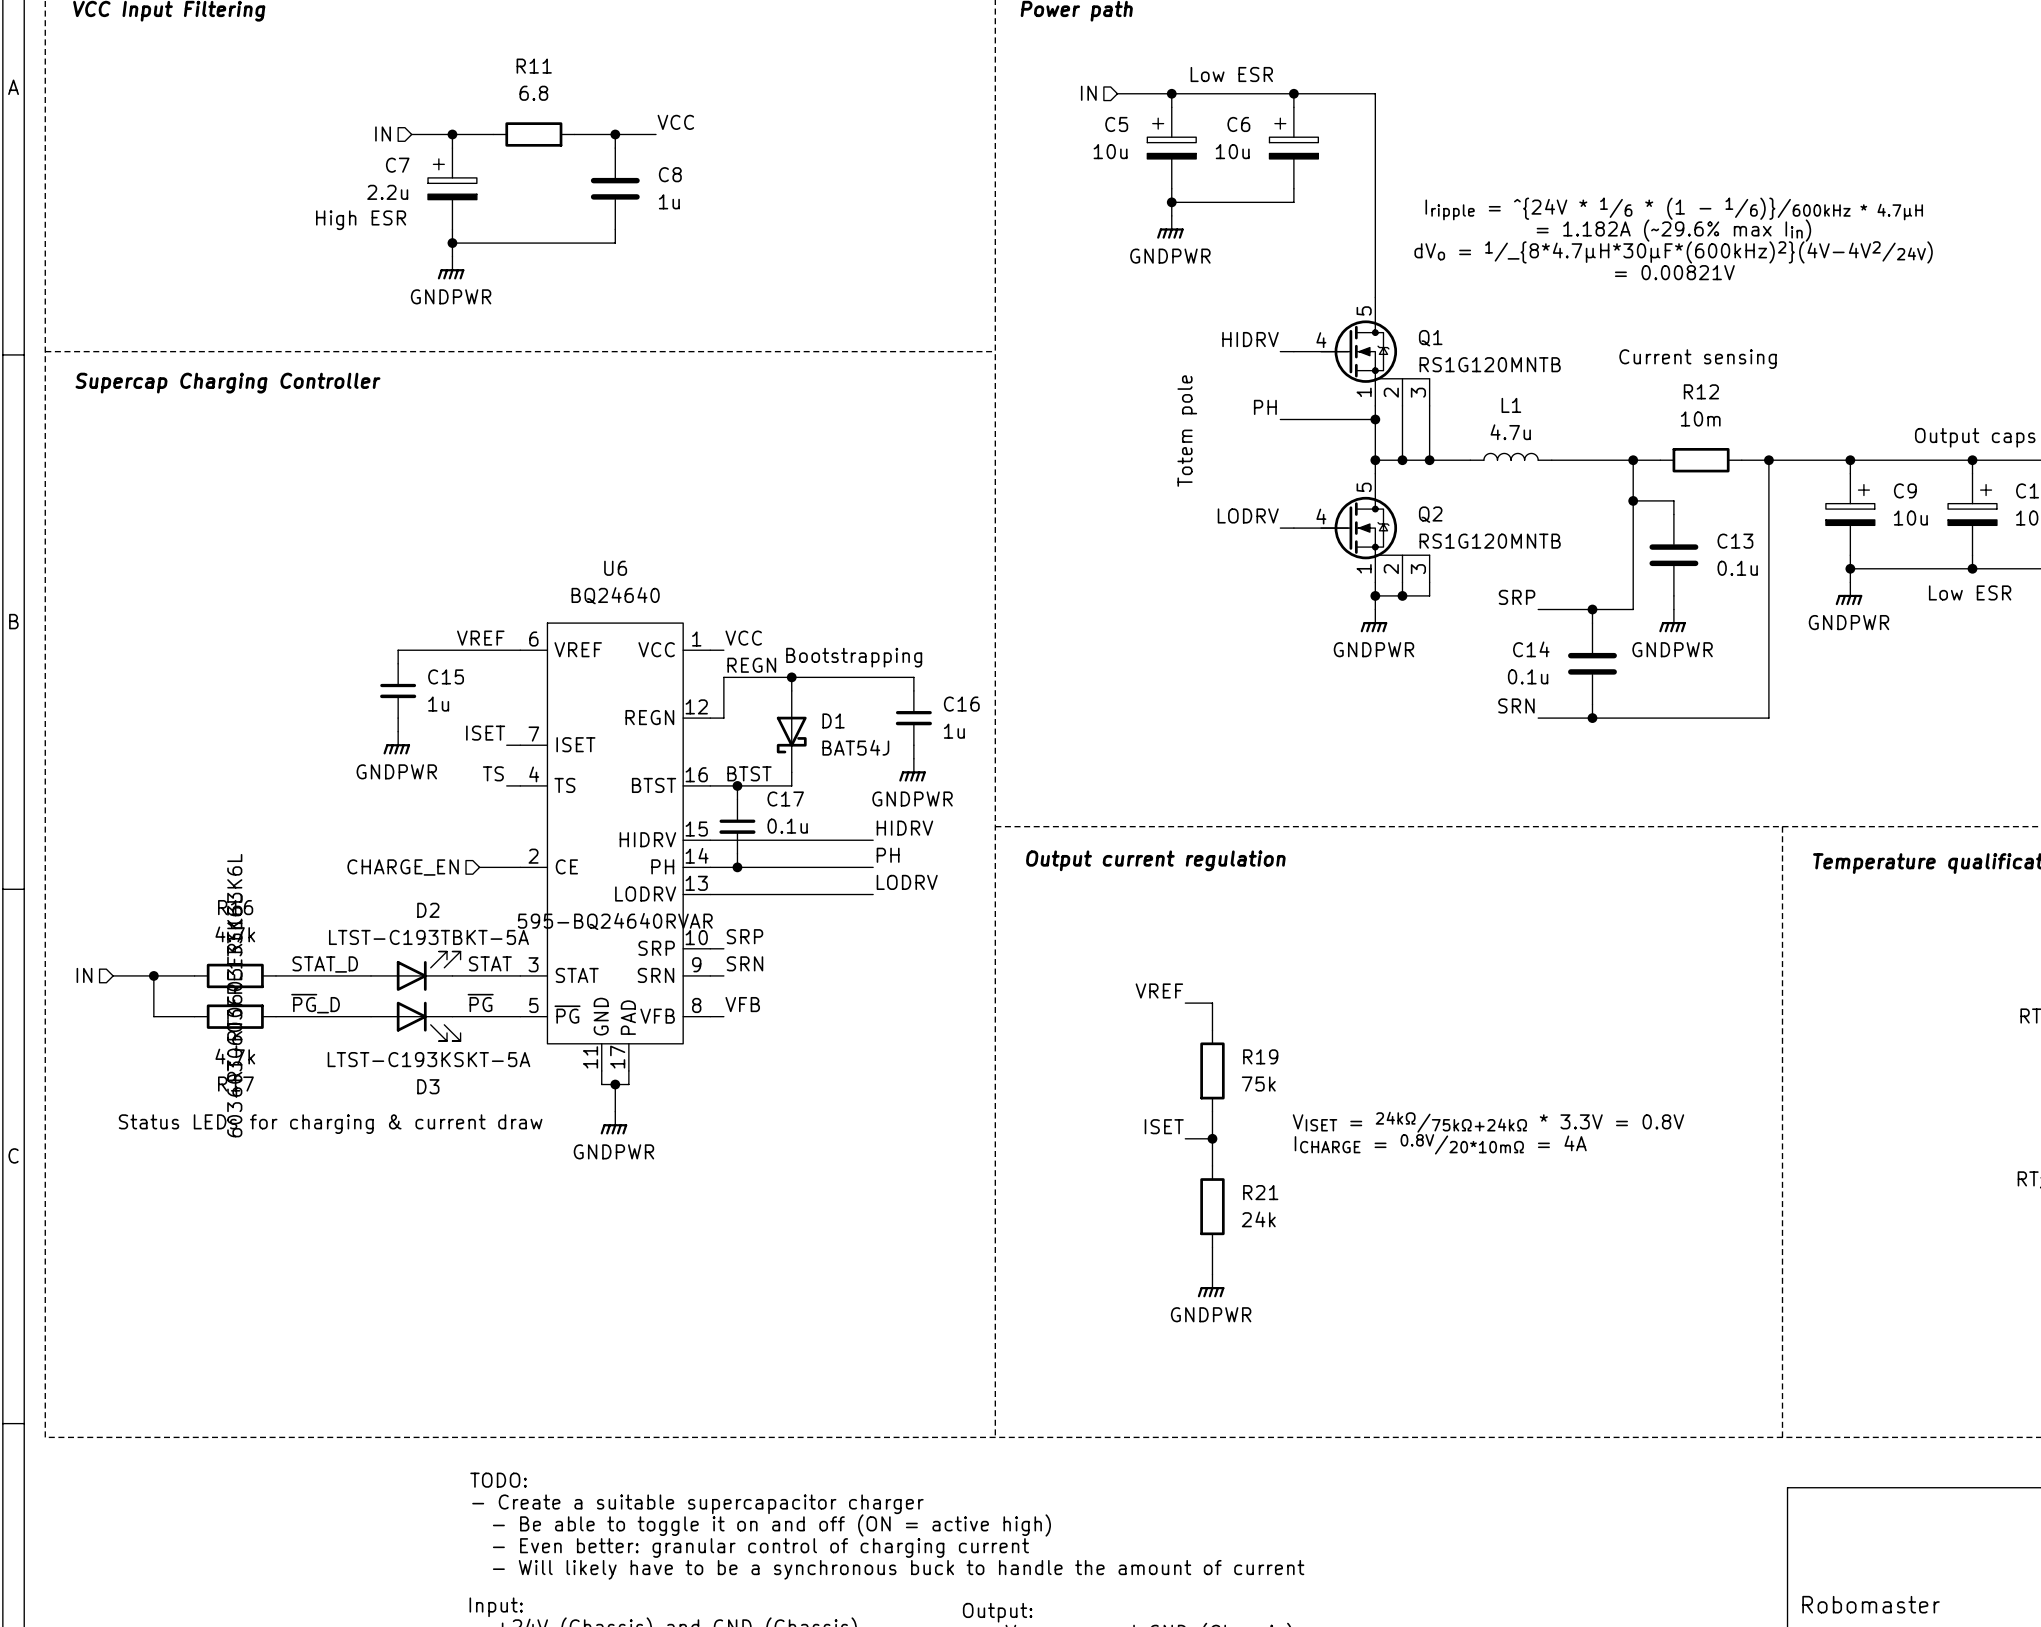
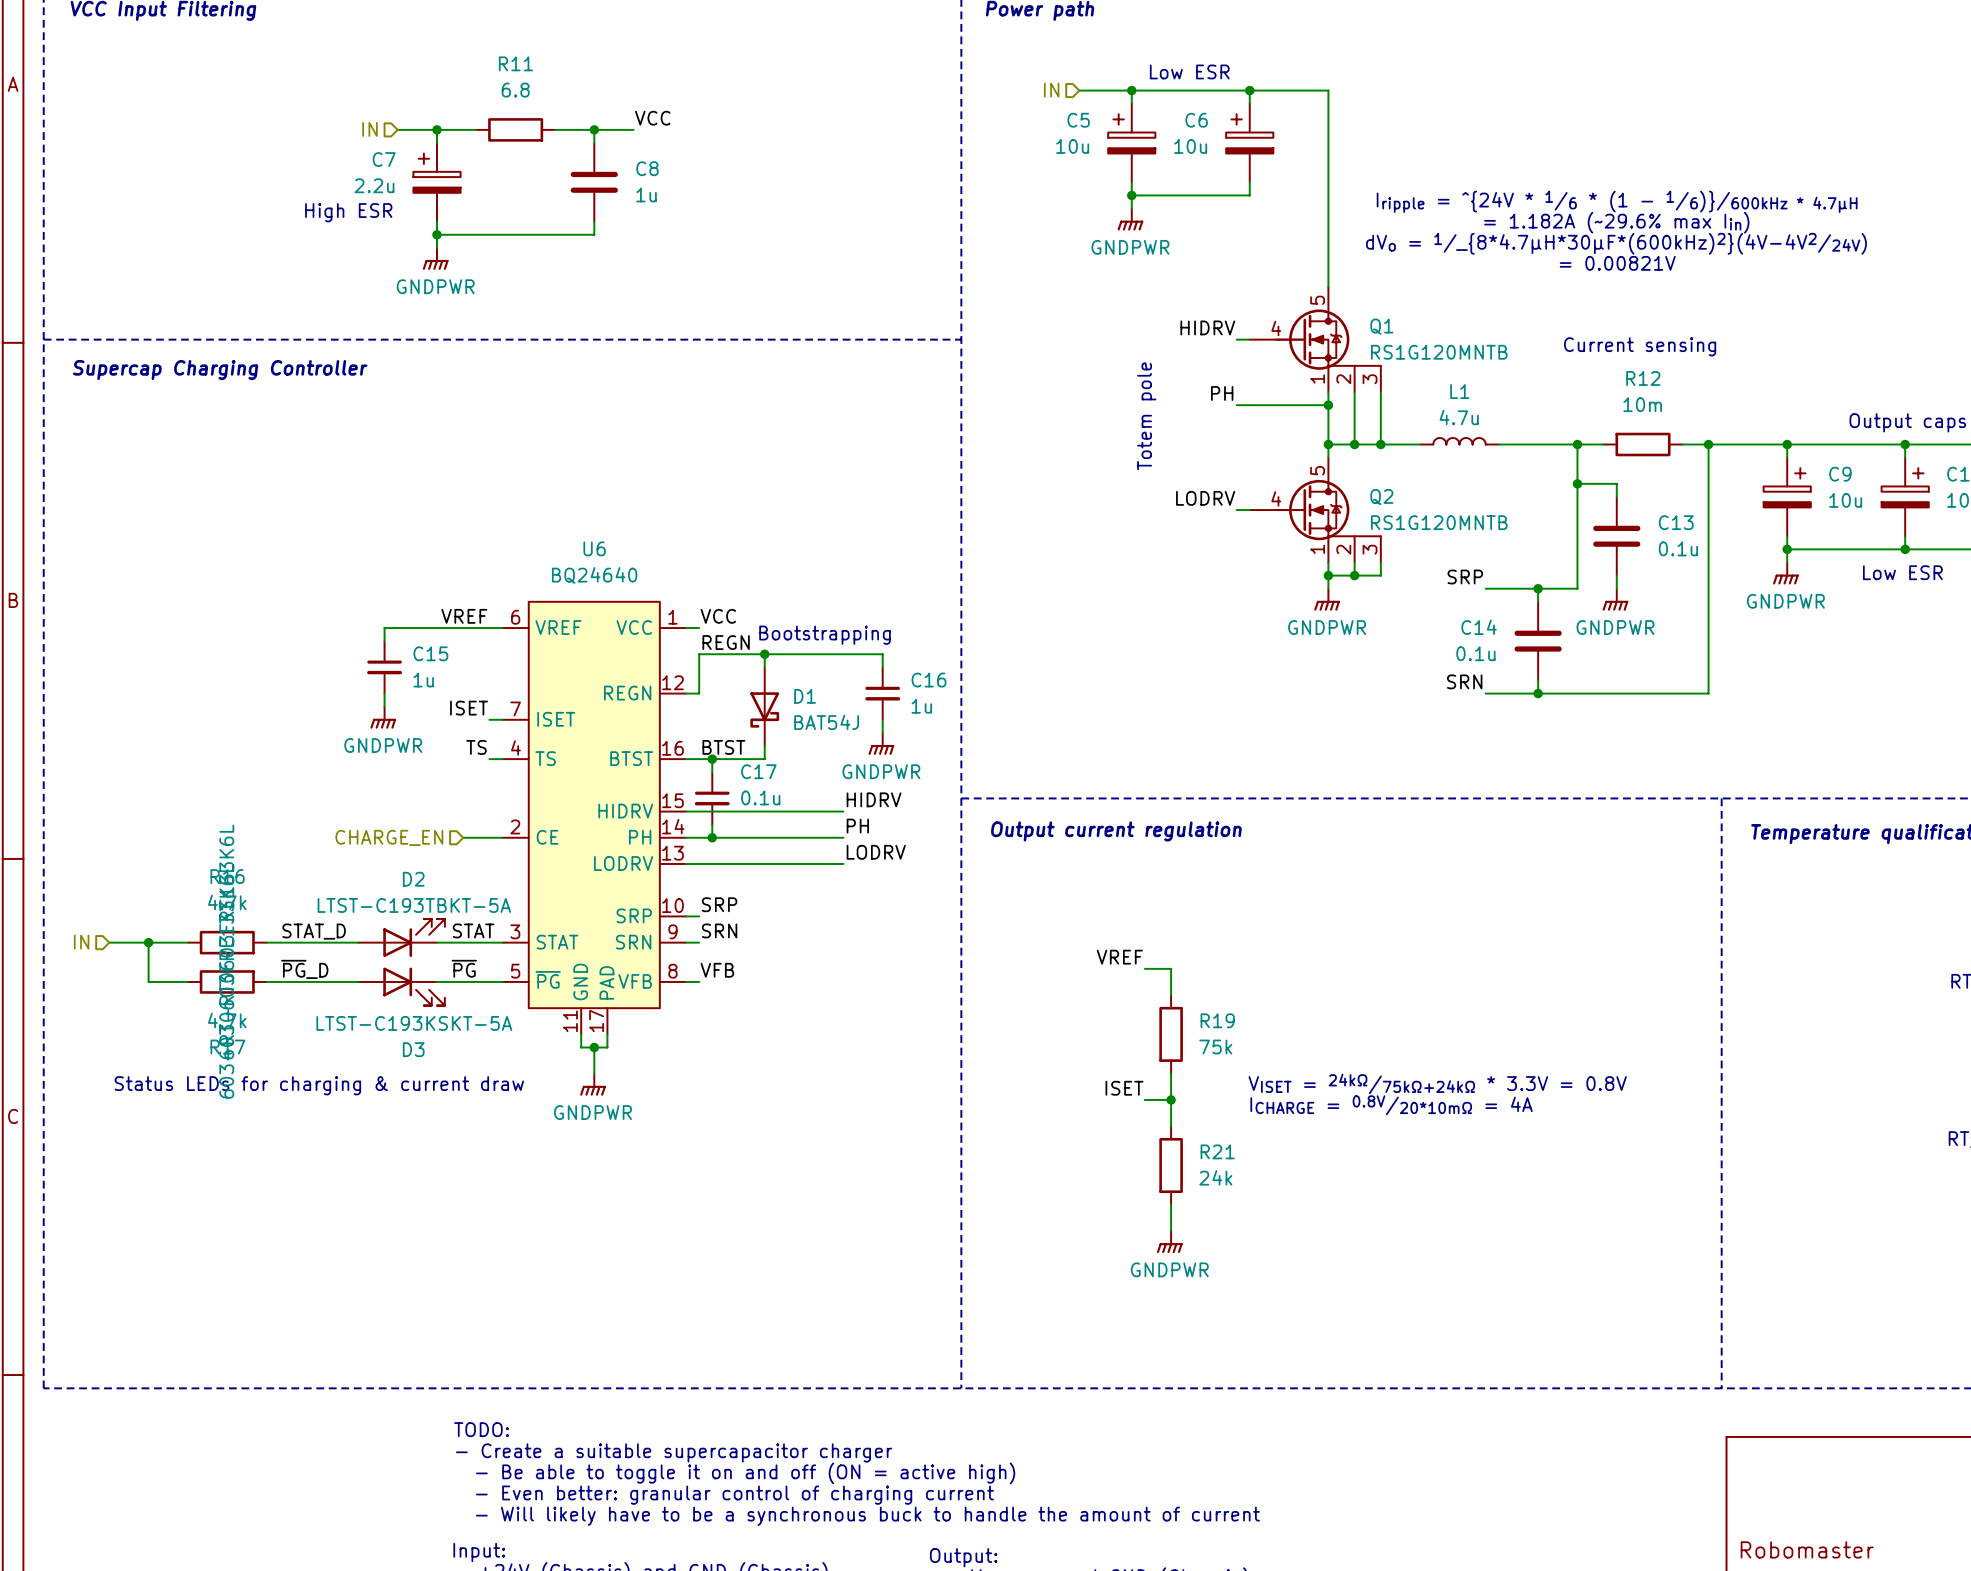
U6 text: 595-BQ24640RVAR (615, 921) -> none

